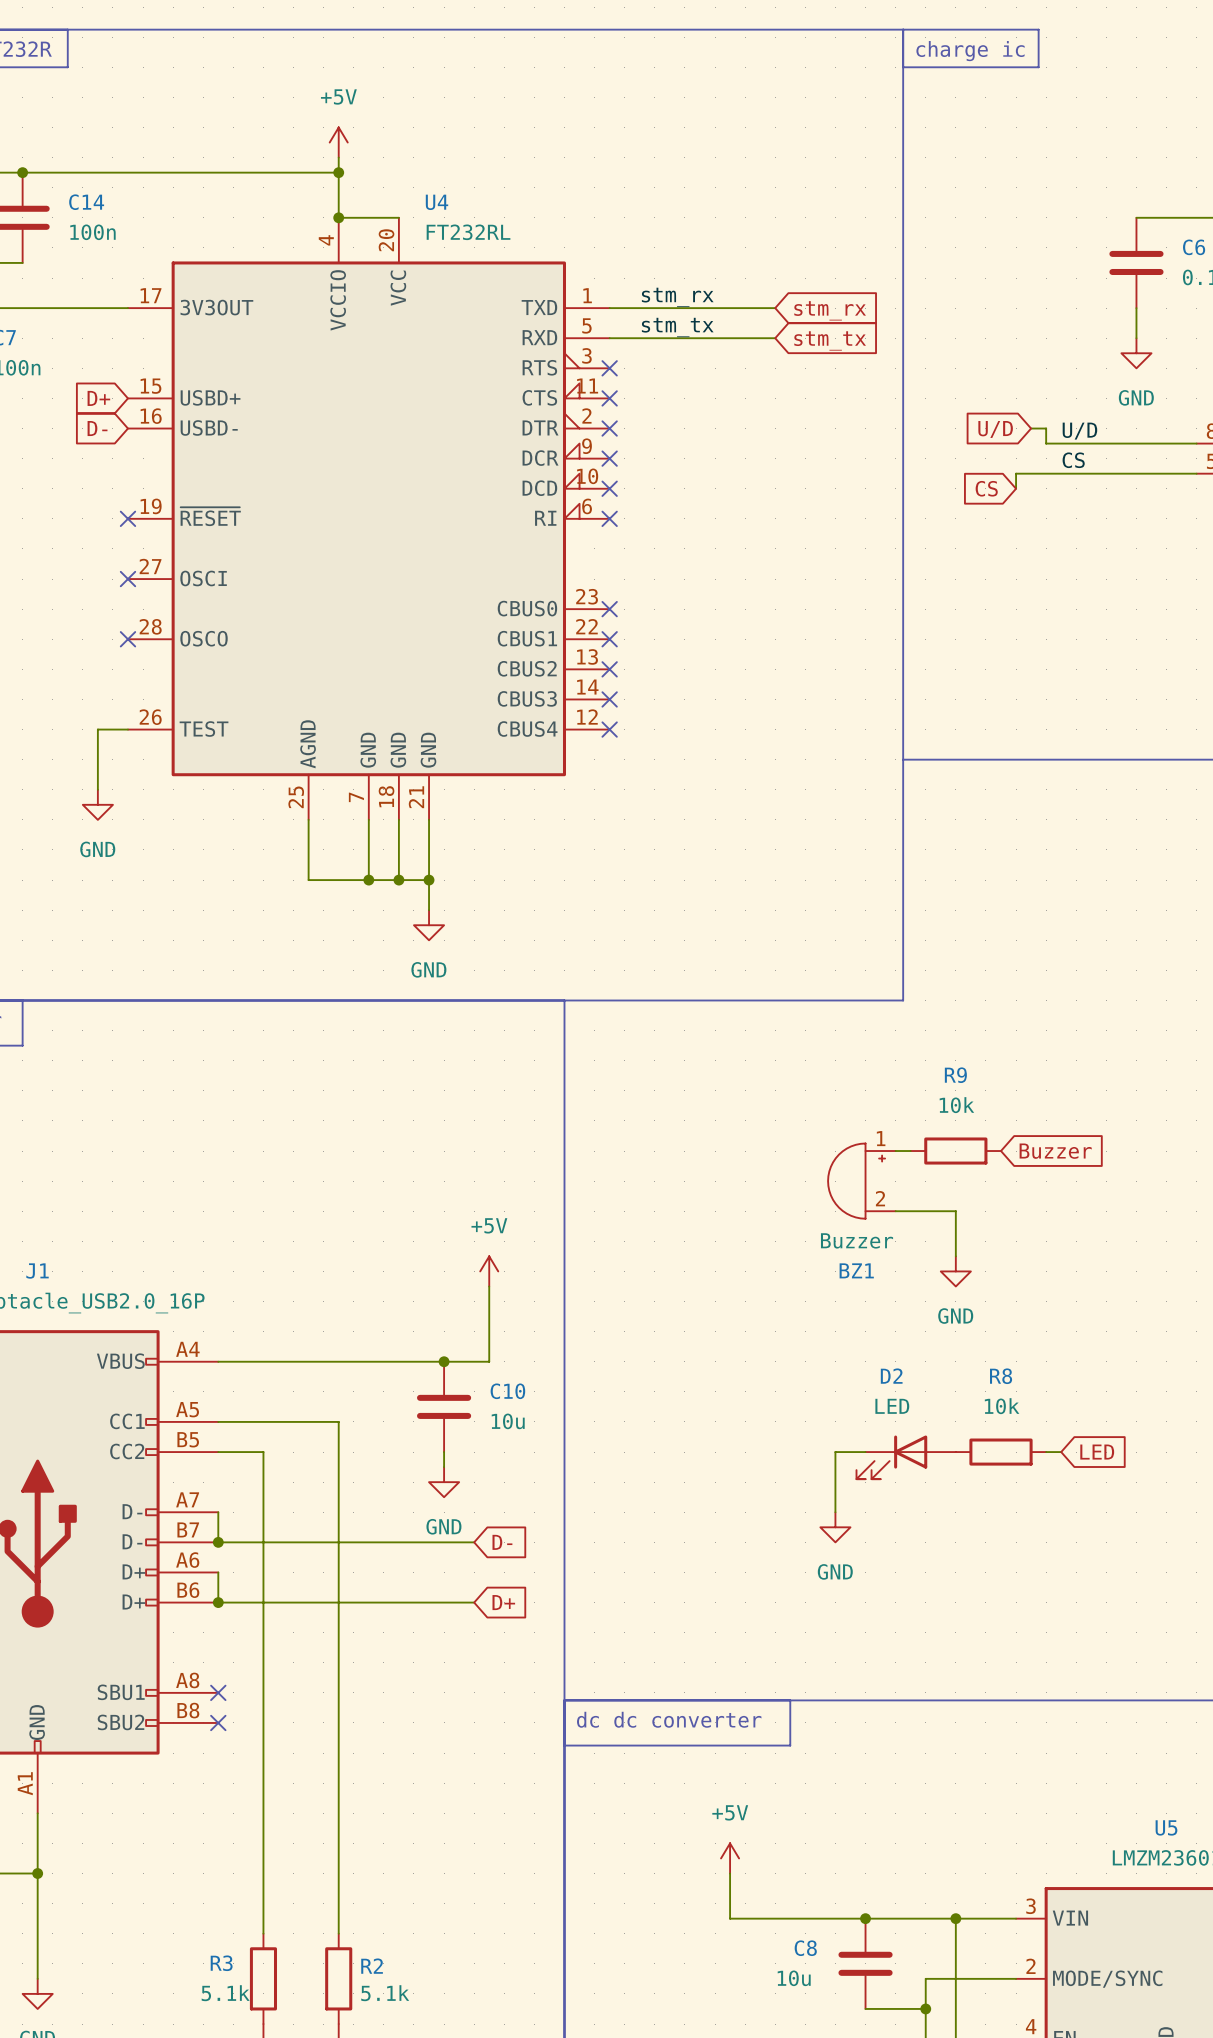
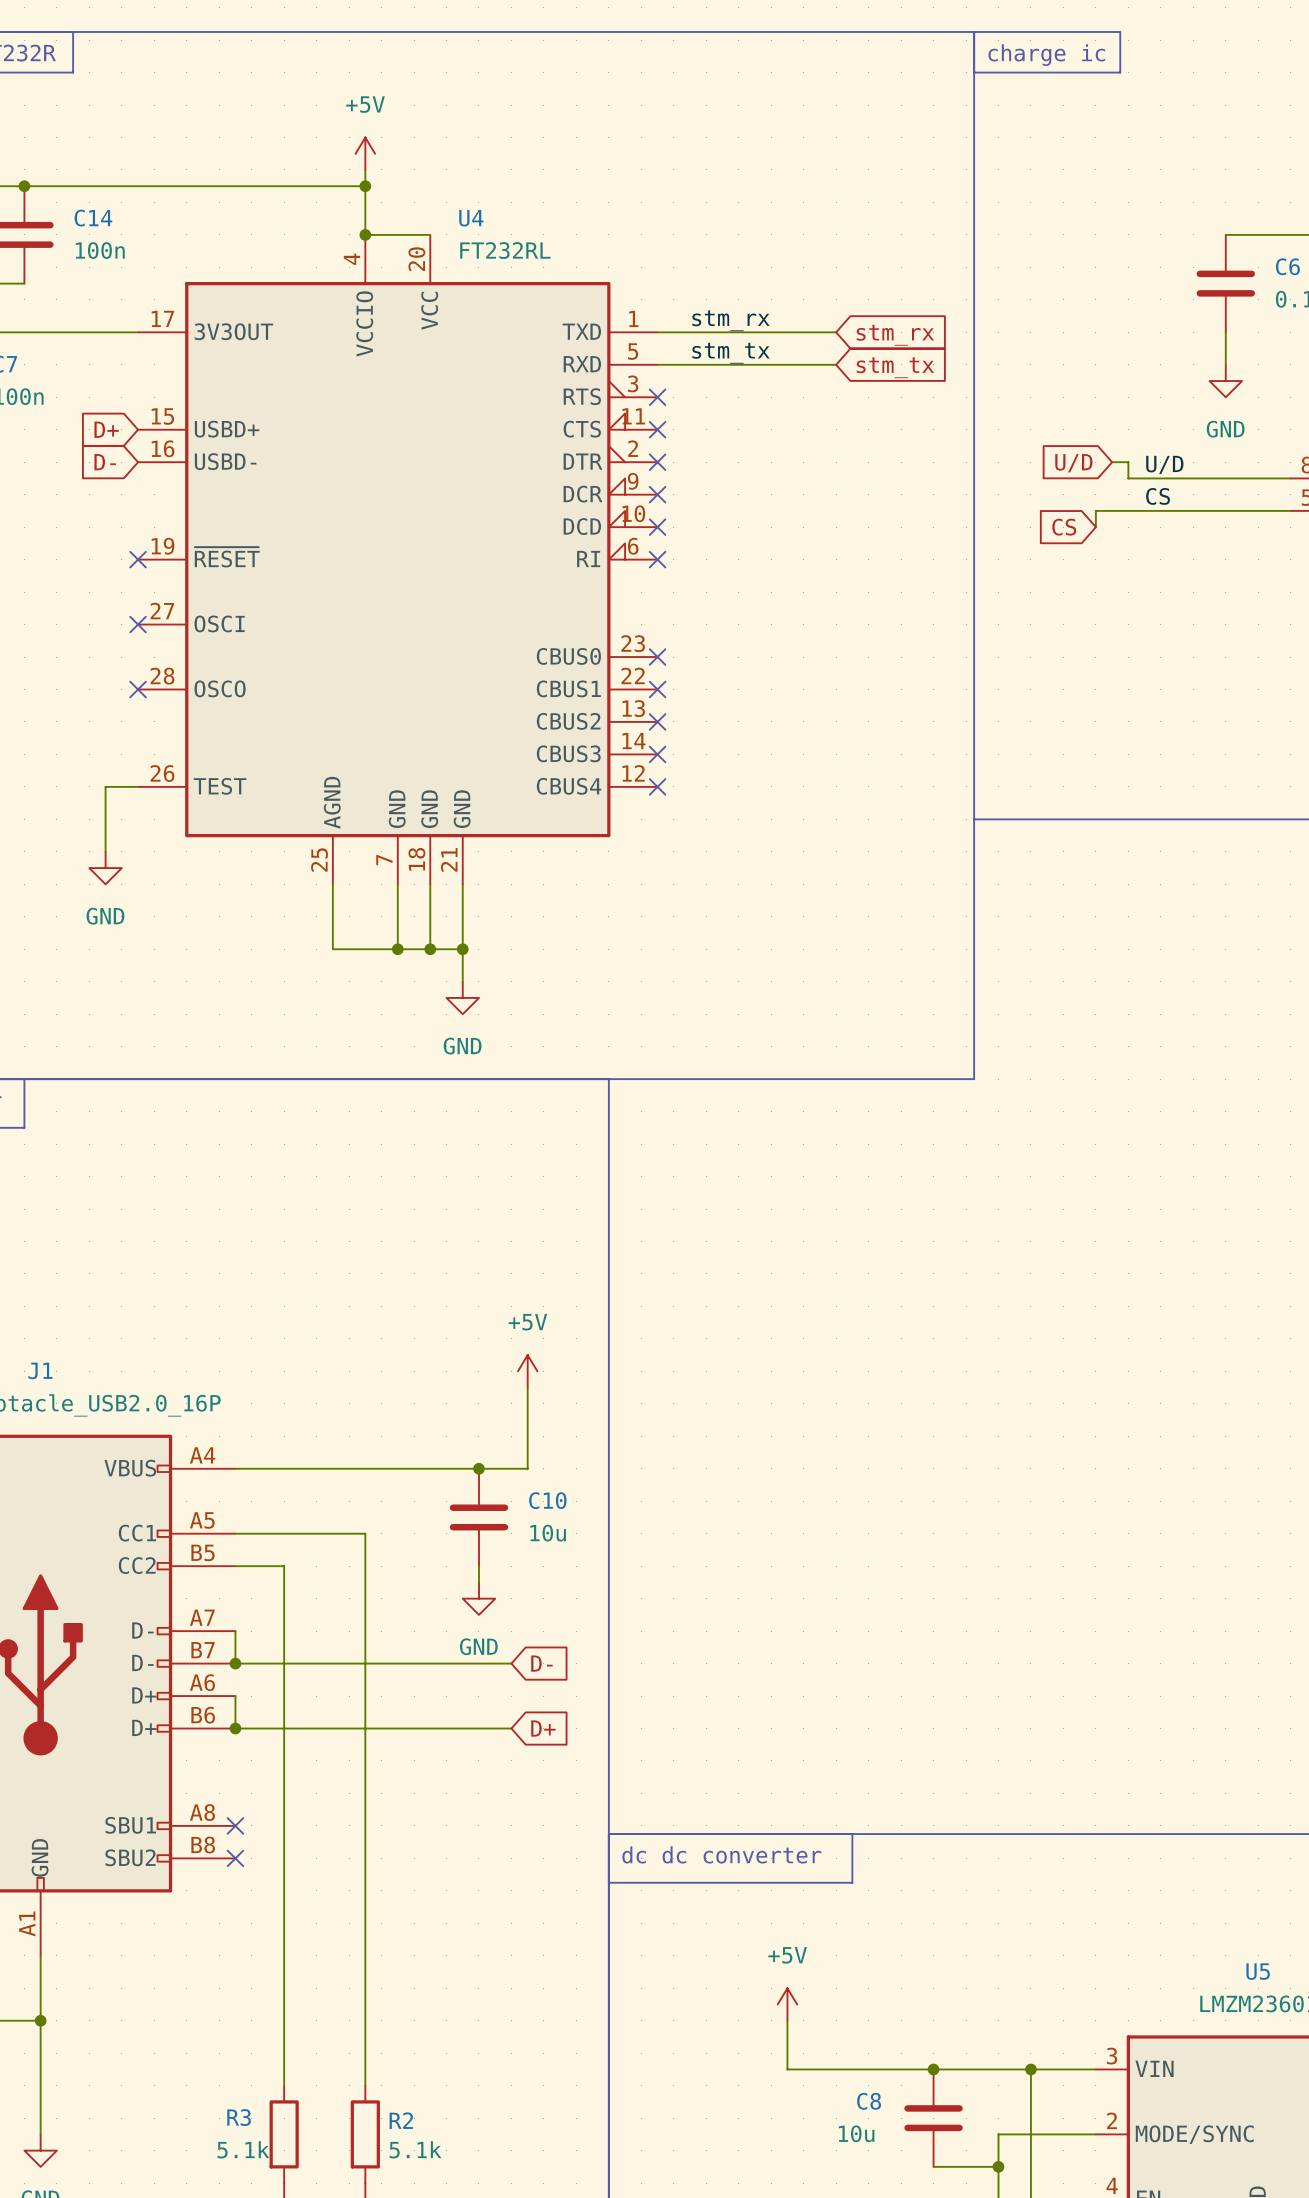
wire: (895, 1151) (910, 1151) -> none
R9: 10k (955, 1151) -> none
global label: Buzzer (1055, 1151) -> none
BZ1: Buzzer (861, 1181) -> none
wire: (895, 1211) (955, 1211) (955, 1256) -> none
power symbol: GND (955, 1271) -> none
wire: (865, 1452) (835, 1452) (835, 1512) -> none
R8: 10k (1001, 1452) -> none
wire: (1046, 1452) (1061, 1452) -> none
global label: LED (1097, 1452) -> none
D2: LED (906, 1457) -> none
power symbol: GND (835, 1527) -> none

